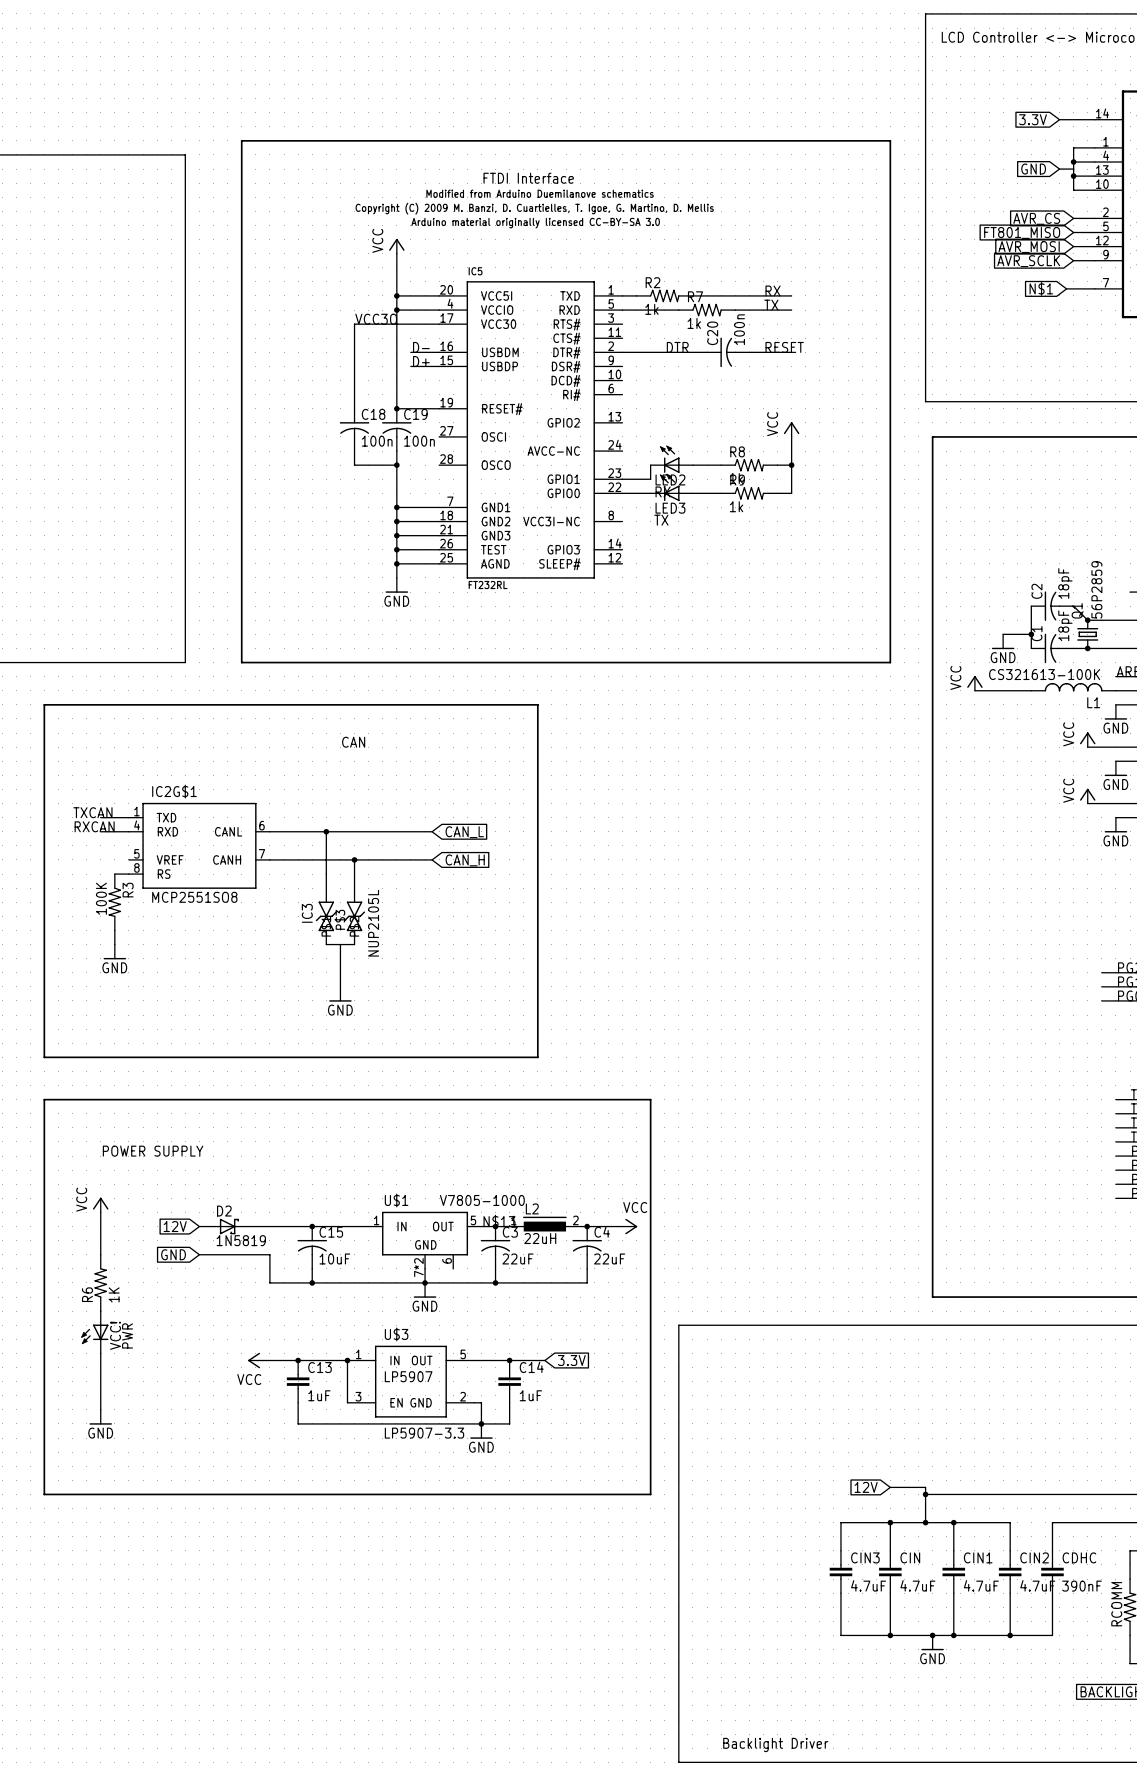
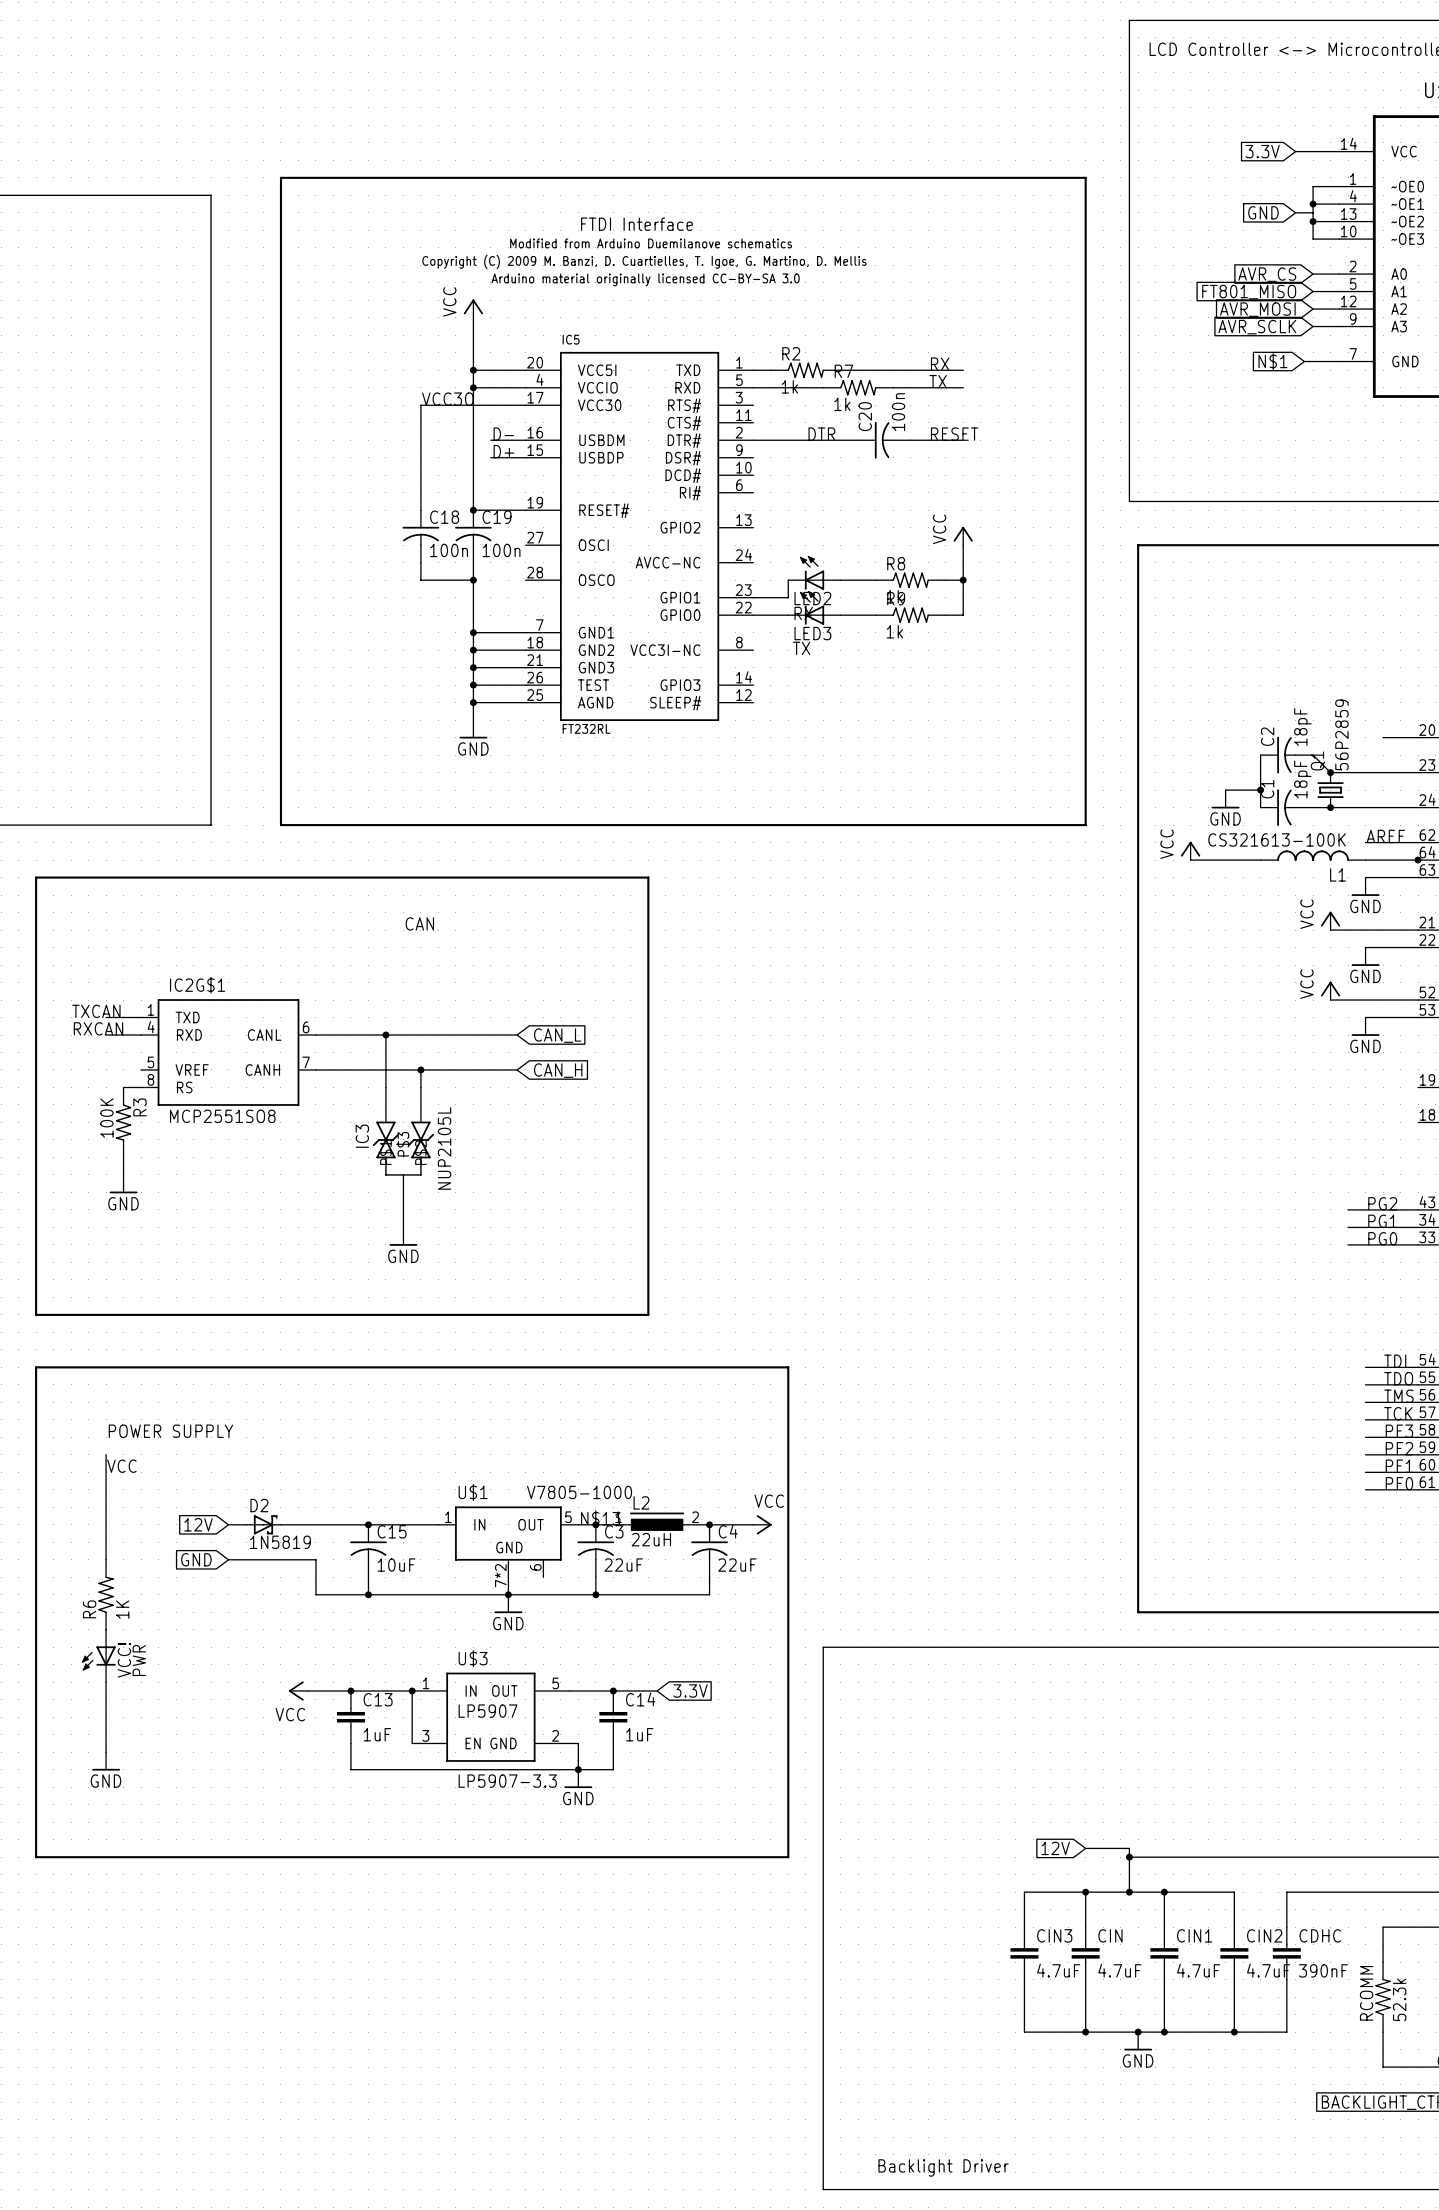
wire: none -> (106, 1454) (106, 1507)
label: none -> VCC (121, 1466)
power symbol: VCC (100, 1205) -> none

